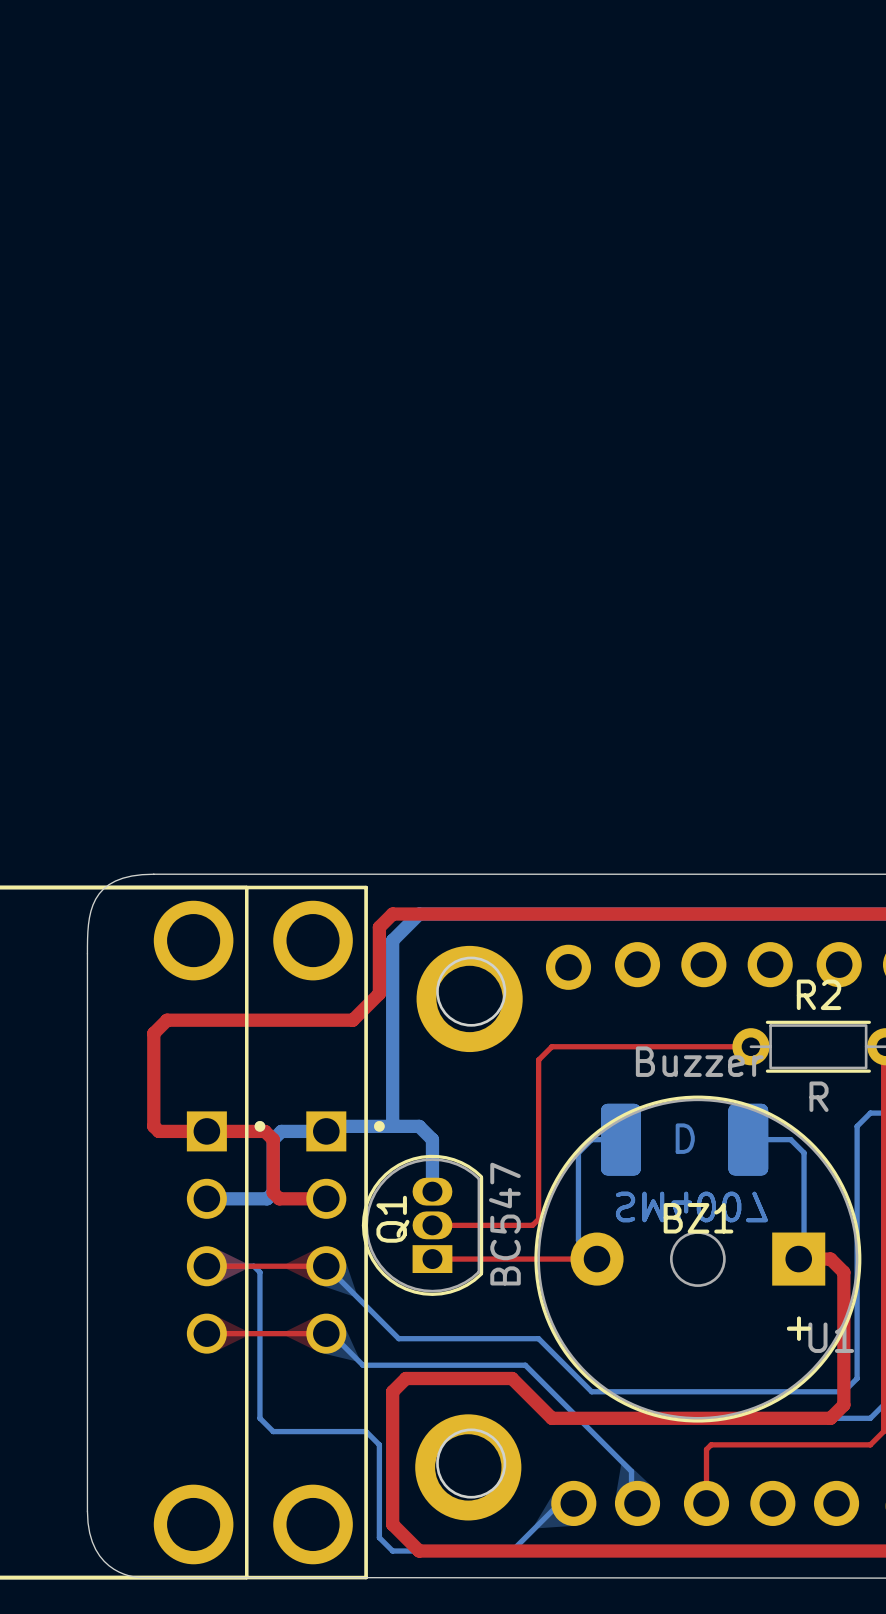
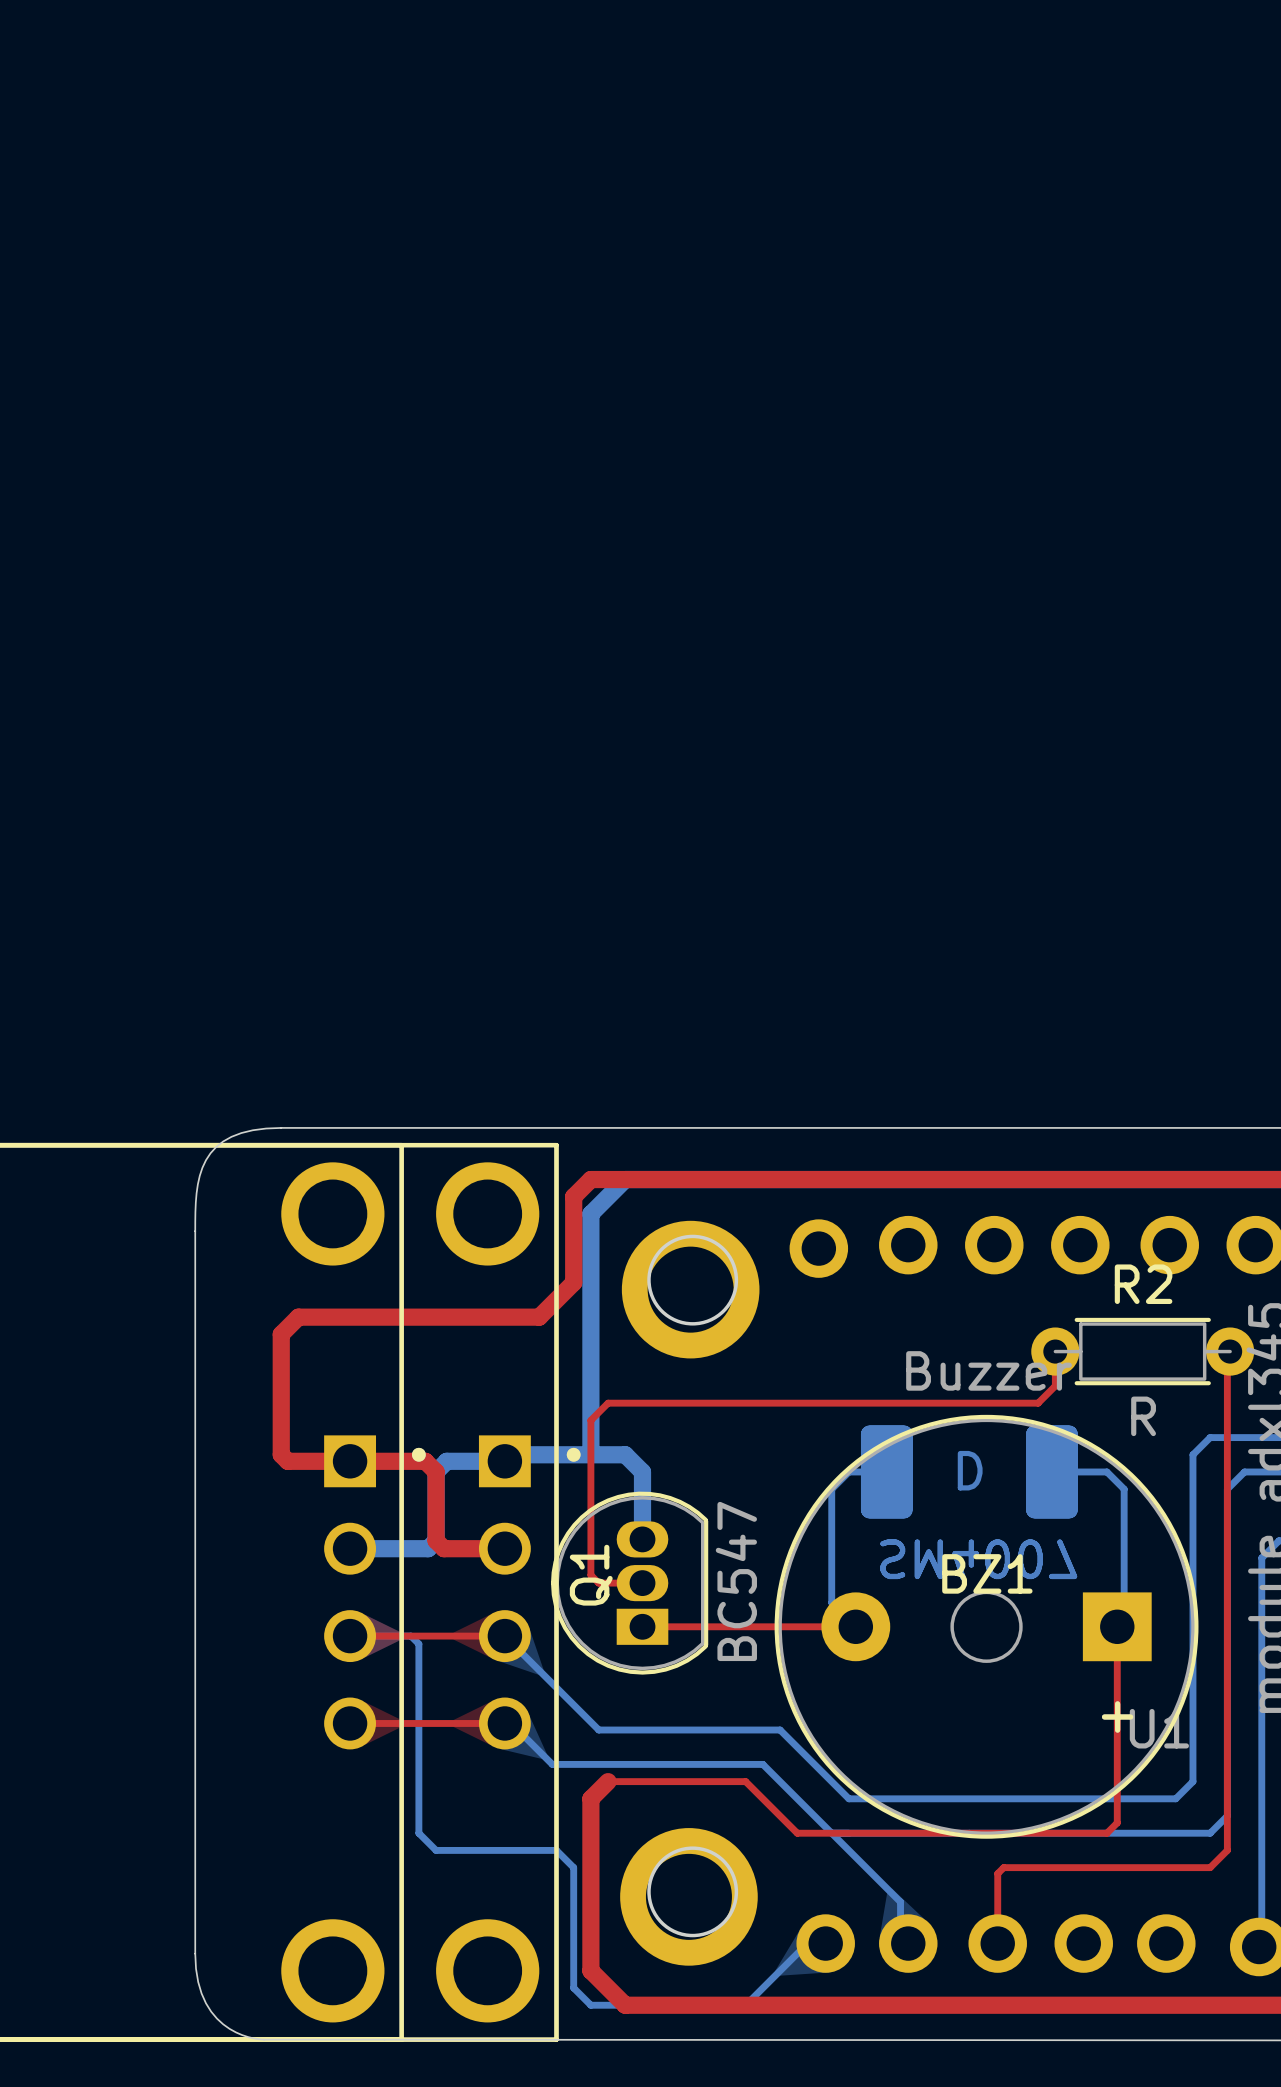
top track: (750, 1046) (551, 1046) (538, 1060) (538, 1219) (532, 1225) (432, 1225) -> (1055, 1351) (1055, 1385) (1038, 1403) (608, 1403) (590, 1420) (590, 1575) (598, 1583) (642, 1583)
top track: (798, 1259) (830, 1259) (843, 1272) (843, 1405) (830, 1418) (790, 1418) -> (1117, 1626) (1117, 1822) (1106, 1833)
top track width: thick (405, 1378) (512, 1378) (551, 1418) (790, 1418) -> thin (608, 1781) (745, 1781) (797, 1833) (1106, 1833)

